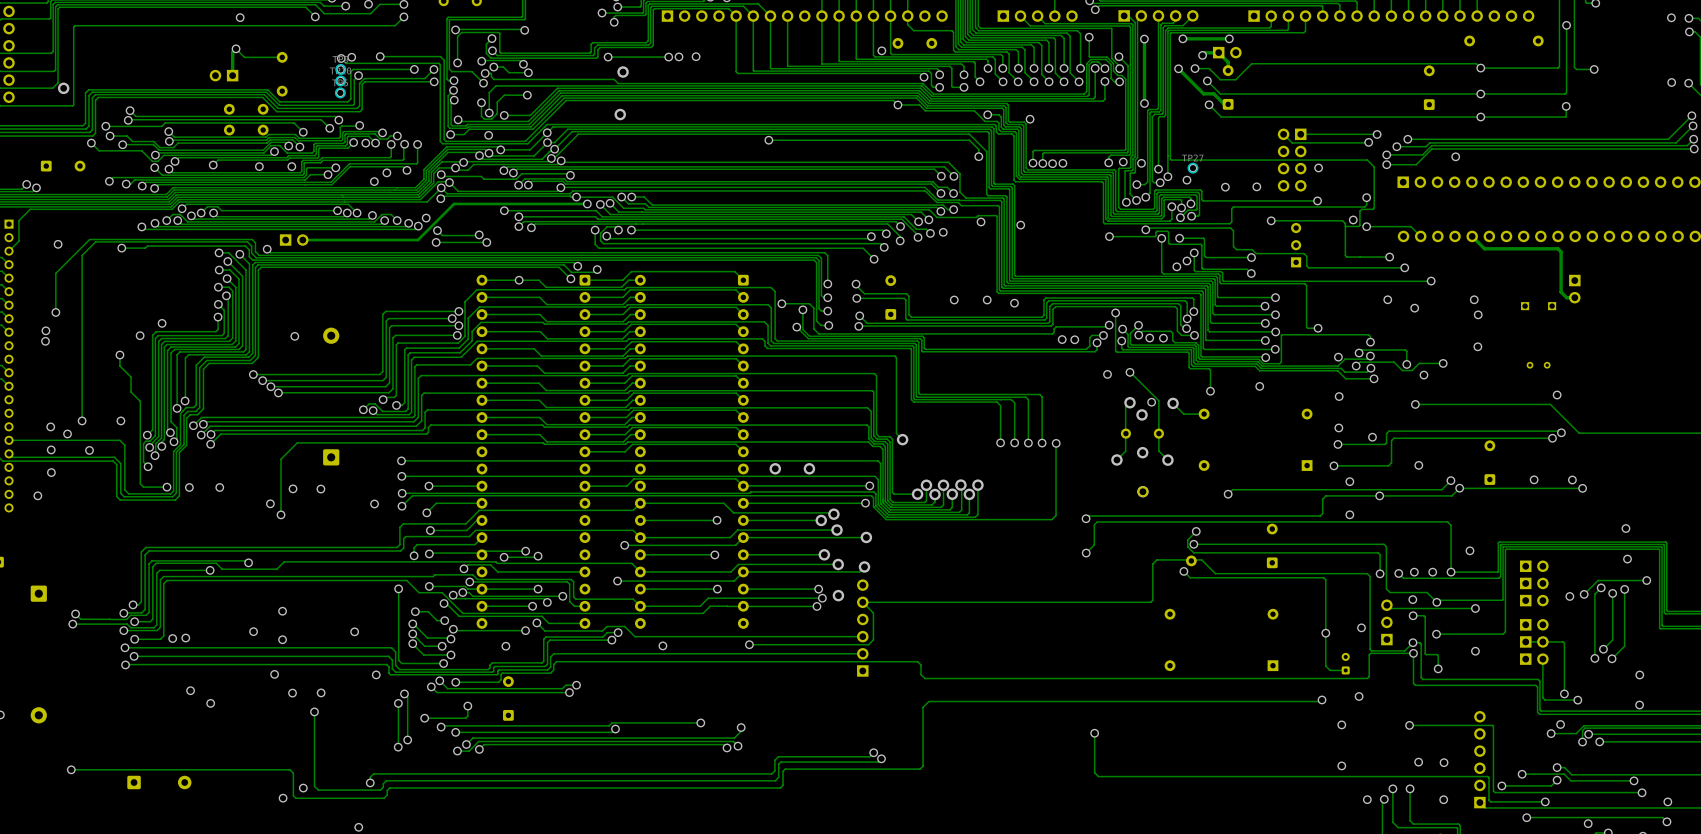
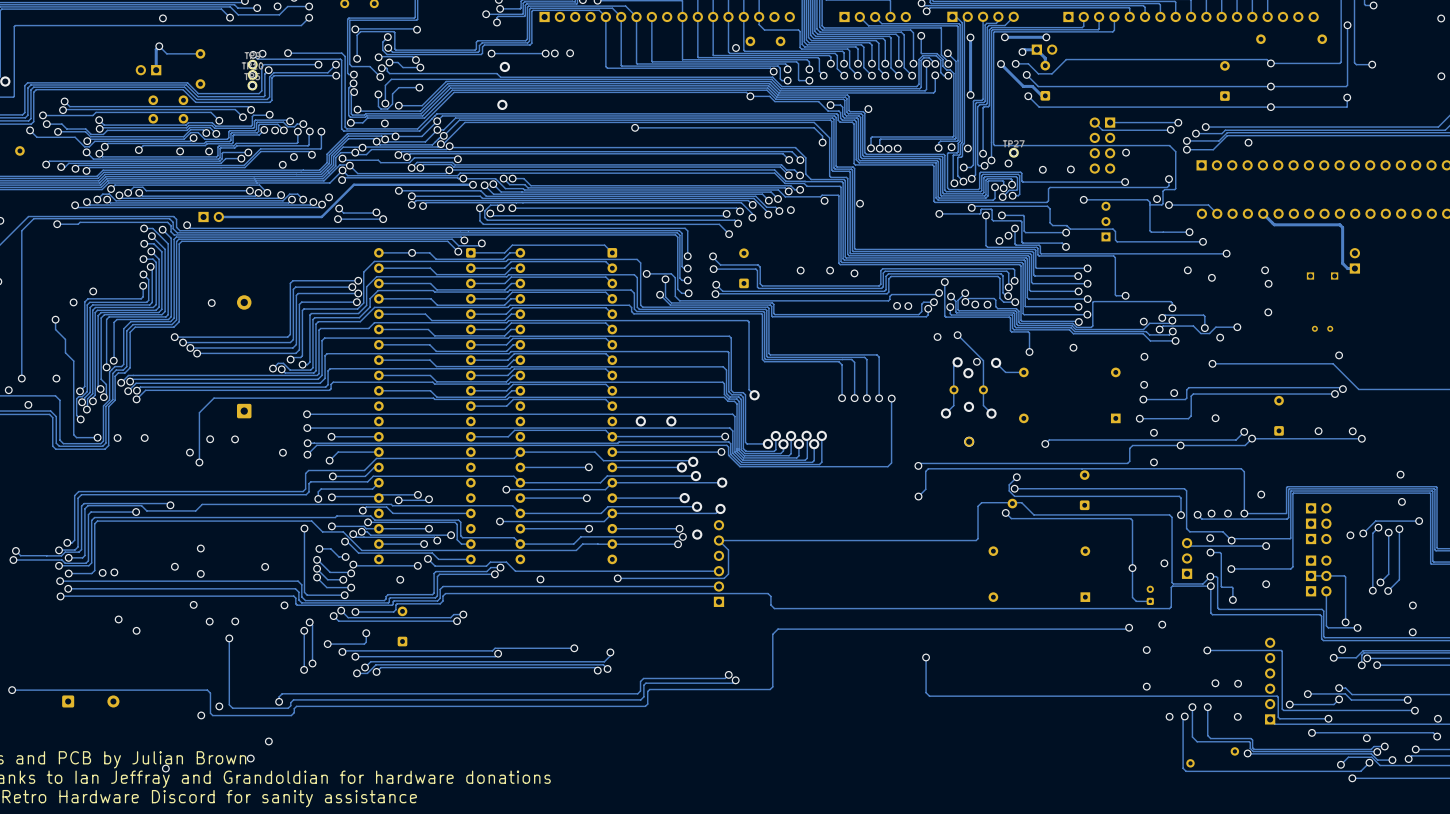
part rotation: 0° (1574, 289) -> 180° (1354, 260)

